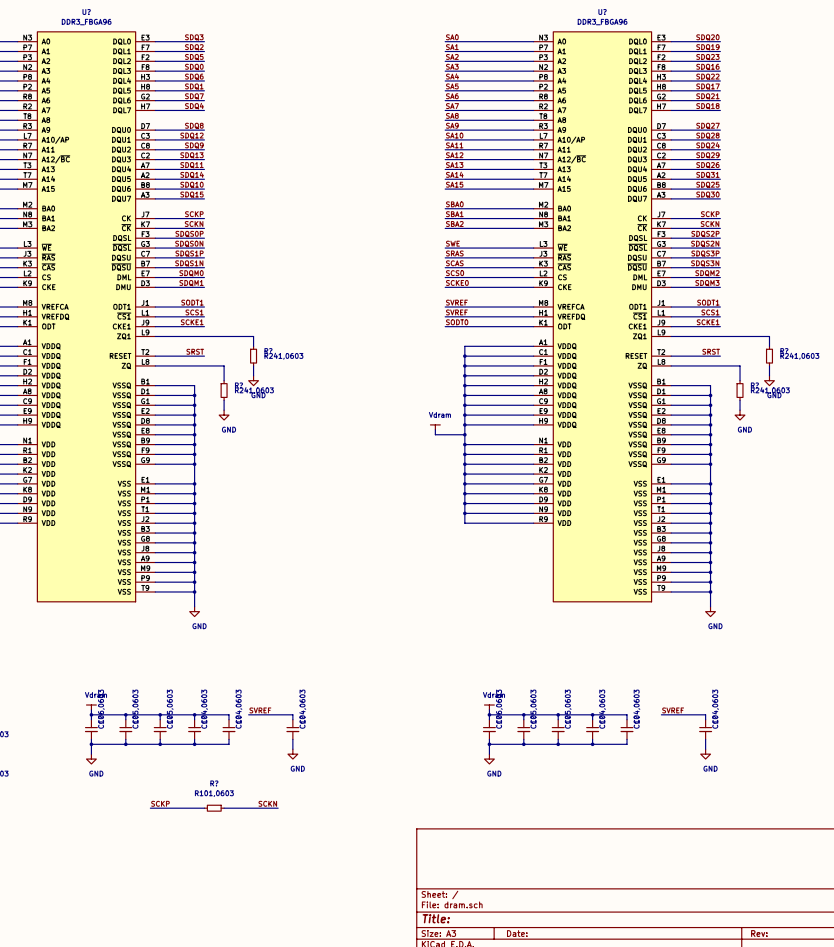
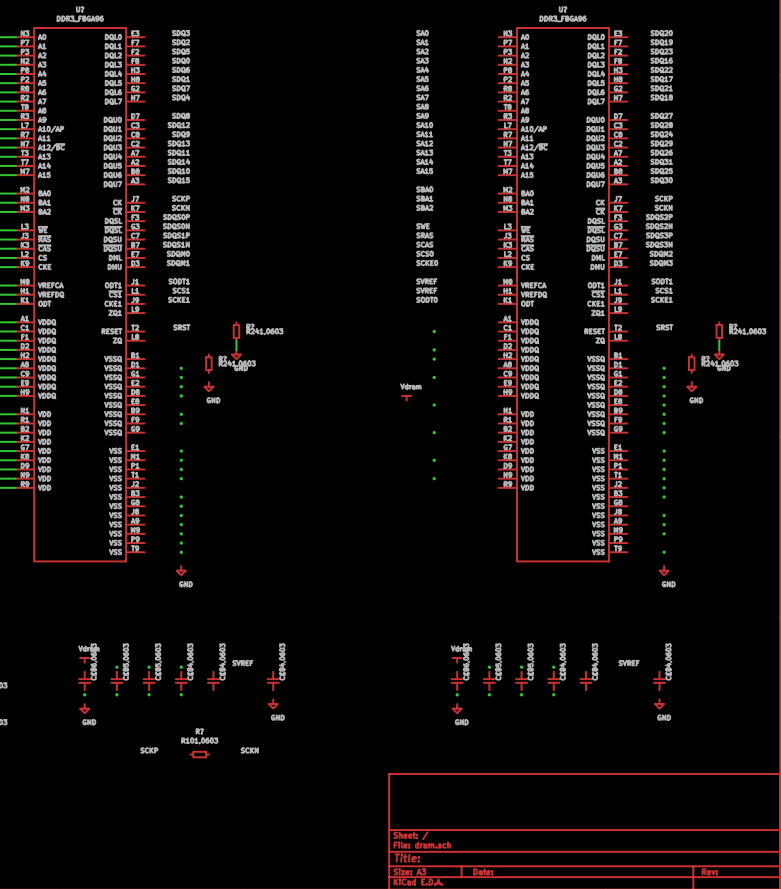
wire: (155, 41) (204, 41) -> none
wire: (445, 41) (533, 41) -> none
wire: (671, 41) (720, 41) -> none
wire: (155, 51) (204, 51) -> none
wire: (445, 51) (533, 51) -> none
wire: (671, 51) (720, 51) -> none
wire: (155, 61) (204, 61) -> none
wire: (445, 61) (533, 61) -> none
wire: (671, 61) (720, 61) -> none
wire: (155, 71) (204, 71) -> none
wire: (445, 71) (533, 71) -> none
wire: (671, 71) (720, 71) -> none
wire: (155, 80) (204, 80) -> none
wire: (445, 80) (533, 80) -> none
wire: (671, 80) (720, 80) -> none
wire: (155, 90) (204, 90) -> none
wire: (445, 90) (533, 90) -> none
wire: (671, 90) (720, 90) -> none
wire: (155, 100) (204, 100) -> none
wire: (445, 100) (533, 100) -> none
wire: (671, 100) (720, 100) -> none
wire: (155, 110) (204, 110) -> none
wire: (445, 110) (533, 110) -> none
wire: (671, 110) (720, 110) -> none
wire: (445, 120) (533, 120) -> none
wire: (155, 130) (204, 130) -> none
wire: (445, 130) (533, 130) -> none
wire: (671, 130) (720, 130) -> none
wire: (155, 139) (204, 139) -> none
wire: (445, 139) (533, 139) -> none
wire: (671, 139) (720, 139) -> none
wire: (155, 149) (204, 149) -> none
wire: (445, 149) (533, 149) -> none
wire: (671, 149) (720, 149) -> none
wire: (155, 159) (204, 159) -> none
wire: (445, 159) (533, 159) -> none
wire: (671, 159) (720, 159) -> none
wire: (155, 169) (204, 169) -> none
wire: (445, 169) (533, 169) -> none
wire: (671, 169) (720, 169) -> none
wire: (155, 179) (204, 179) -> none
wire: (445, 179) (533, 179) -> none
wire: (671, 179) (720, 179) -> none
wire: (155, 189) (204, 189) -> none
wire: (445, 189) (533, 189) -> none
wire: (671, 189) (720, 189) -> none
wire: (155, 198) (204, 198) -> none
wire: (671, 198) (720, 198) -> none
wire: (445, 208) (533, 208) -> none
wire: (155, 218) (204, 218) -> none
wire: (445, 218) (533, 218) -> none
wire: (671, 218) (720, 218) -> none
wire: (155, 228) (204, 228) -> none
wire: (445, 228) (533, 228) -> none
wire: (671, 228) (720, 228) -> none
wire: (155, 238) (204, 238) -> none
wire: (671, 238) (720, 238) -> none
wire: (155, 248) (204, 248) -> none
wire: (445, 248) (533, 248) -> none
wire: (671, 248) (720, 248) -> none
wire: (155, 257) (204, 257) -> none
wire: (445, 257) (533, 257) -> none
wire: (671, 257) (720, 257) -> none
wire: (155, 267) (204, 267) -> none
wire: (445, 267) (533, 267) -> none
wire: (671, 267) (720, 267) -> none
wire: (155, 277) (204, 277) -> none
wire: (445, 277) (533, 277) -> none
wire: (671, 277) (720, 277) -> none
wire: (155, 287) (204, 287) -> none
wire: (445, 287) (533, 287) -> none
wire: (671, 287) (720, 287) -> none
wire: (155, 307) (204, 307) -> none
wire: (445, 307) (533, 307) -> none
wire: (671, 307) (720, 307) -> none
wire: (155, 316) (204, 316) -> none
wire: (445, 316) (533, 316) -> none
wire: (671, 316) (720, 316) -> none
wire: (155, 326) (204, 326) -> none
wire: (445, 326) (533, 326) -> none
wire: (671, 326) (720, 326) -> none
wire: (155, 336) (253, 336) (253, 346) -> none
wire: (671, 336) (769, 336) (769, 346) -> none
wire: (533, 346) (464, 346) (464, 523) (533, 523) -> none
wire: (155, 356) (204, 356) -> none
wire: (464, 356) (533, 356) -> none
wire: (671, 356) (720, 356) -> none
wire: (155, 365) (224, 365) (224, 380) -> none
wire: (464, 365) (533, 365) -> none
junction: (464, 365) -> none
wire: (671, 365) (740, 365) (740, 380) -> none
wire: (464, 375) (533, 375) -> none
wire: (155, 385) (194, 385) (194, 606) -> none
wire: (464, 385) (533, 385) -> none
wire: (671, 385) (710, 385) (710, 606) -> none
wire: (155, 395) (194, 395) -> none
wire: (464, 395) (533, 395) -> none
junction: (464, 395) -> none
wire: (671, 395) (710, 395) -> none
wire: (224, 400) (224, 410) -> none
wire: (740, 400) (740, 410) -> none
wire: (155, 405) (194, 405) -> none
wire: (464, 405) (533, 405) -> none
wire: (671, 405) (710, 405) -> none
wire: (155, 415) (194, 415) -> none
wire: (464, 415) (533, 415) -> none
junction: (464, 415) -> none
wire: (671, 415) (710, 415) -> none
wire: (155, 424) (194, 424) -> none
wire: (464, 424) (533, 424) -> none
junction: (464, 424) -> none
wire: (671, 424) (710, 424) -> none
wire: (435, 429) (435, 434) (464, 434) -> none
wire: (155, 434) (194, 434) -> none
junction: (194, 434) -> none
wire: (671, 434) (710, 434) -> none
wire: (155, 444) (194, 444) -> none
wire: (464, 444) (533, 444) -> none
junction: (464, 444) -> none
wire: (671, 444) (710, 444) -> none
wire: (155, 454) (194, 454) -> none
wire: (464, 454) (533, 454) -> none
junction: (464, 454) -> none
wire: (671, 454) (710, 454) -> none
wire: (155, 464) (194, 464) -> none
junction: (194, 464) -> none
wire: (464, 464) (533, 464) -> none
wire: (671, 464) (710, 464) -> none
wire: (464, 474) (533, 474) -> none
junction: (464, 474) -> none
wire: (155, 483) (194, 483) -> none
wire: (464, 483) (533, 483) -> none
junction: (464, 483) -> none
wire: (671, 483) (710, 483) -> none
wire: (155, 493) (194, 493) -> none
wire: (464, 493) (533, 493) -> none
wire: (671, 493) (710, 493) -> none
wire: (155, 503) (194, 503) -> none
wire: (464, 503) (533, 503) -> none
junction: (464, 503) -> none
wire: (671, 503) (710, 503) -> none
wire: (155, 513) (194, 513) -> none
wire: (464, 513) (533, 513) -> none
wire: (671, 513) (710, 513) -> none
wire: (155, 523) (194, 523) -> none
junction: (194, 523) -> none
wire: (671, 523) (710, 523) -> none
wire: (155, 533) (194, 533) -> none
wire: (671, 533) (710, 533) -> none
wire: (155, 542) (194, 542) -> none
wire: (671, 542) (710, 542) -> none
junction: (710, 542) -> none
wire: (155, 552) (194, 552) -> none
wire: (671, 552) (710, 552) -> none
wire: (155, 562) (194, 562) -> none
wire: (671, 562) (710, 562) -> none
wire: (155, 572) (194, 572) -> none
wire: (671, 572) (710, 572) -> none
wire: (155, 582) (194, 582) -> none
wire: (671, 582) (710, 582) -> none
junction: (710, 582) -> none
wire: (155, 591) (194, 591) -> none
wire: (671, 591) (710, 591) -> none
wire: (91, 709) (91, 719) -> none
wire: (489, 709) (489, 719) -> none
wire: (91, 714) (229, 714) (229, 719) -> none
junction: (91, 714) -> none
wire: (125, 714) (125, 719) -> none
wire: (160, 714) (160, 719) -> none
wire: (194, 714) (194, 719) -> none
wire: (248, 714) (292, 714) (292, 719) -> none
wire: (489, 714) (627, 714) (627, 719) -> none
junction: (489, 714) -> none
wire: (523, 714) (523, 719) -> none
wire: (558, 714) (558, 719) -> none
wire: (592, 714) (592, 719) -> none
wire: (661, 714) (705, 714) (705, 719) -> none
wire: (91, 739) (91, 754) -> none
wire: (125, 739) (125, 744) -> none
wire: (160, 739) (160, 744) -> none
wire: (194, 739) (194, 744) -> none
wire: (229, 739) (229, 744) (91, 744) -> none
wire: (292, 739) (292, 749) -> none
wire: (489, 739) (489, 754) -> none
wire: (523, 739) (523, 744) -> none
wire: (558, 739) (558, 744) -> none
wire: (592, 739) (592, 744) -> none
wire: (627, 739) (627, 744) (489, 744) -> none
wire: (705, 739) (705, 749) -> none
wire: (150, 808) (204, 808) -> none
wire: (224, 808) (278, 808) -> none

